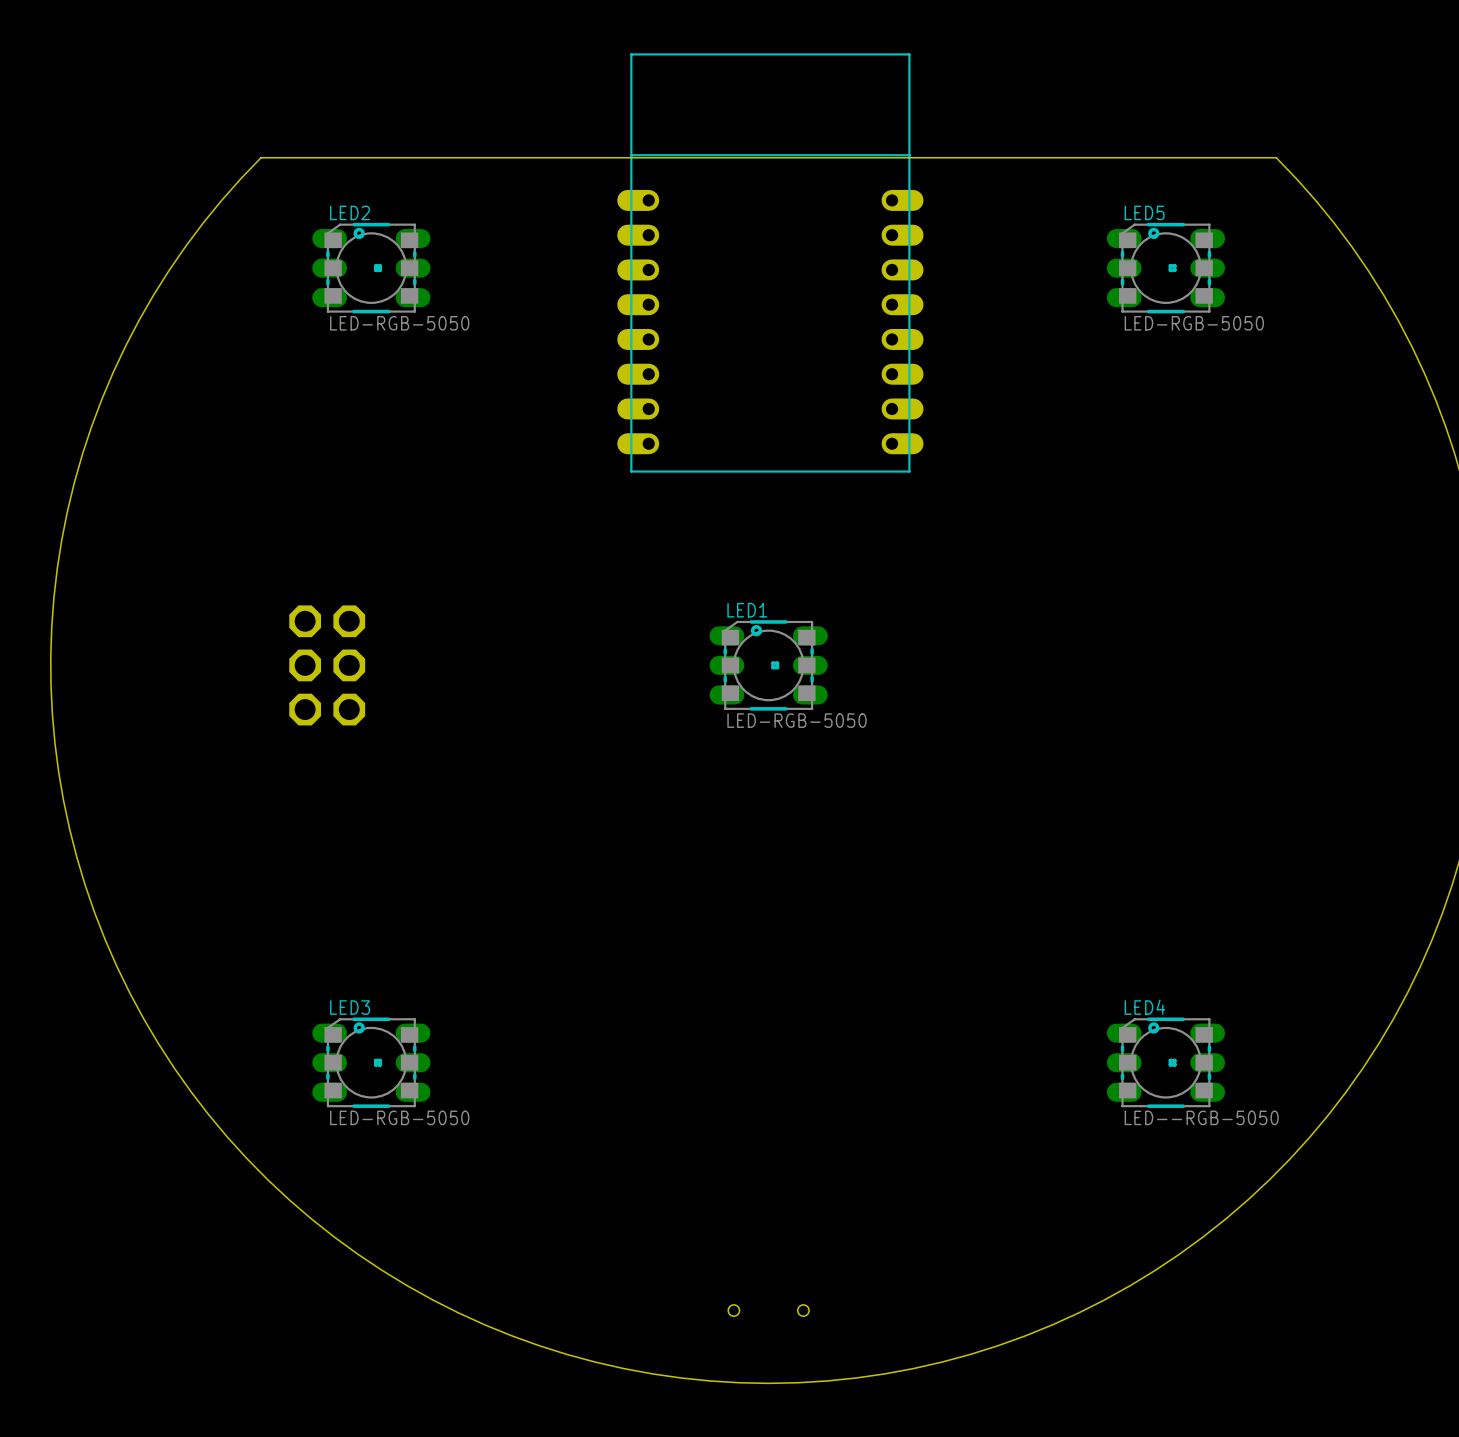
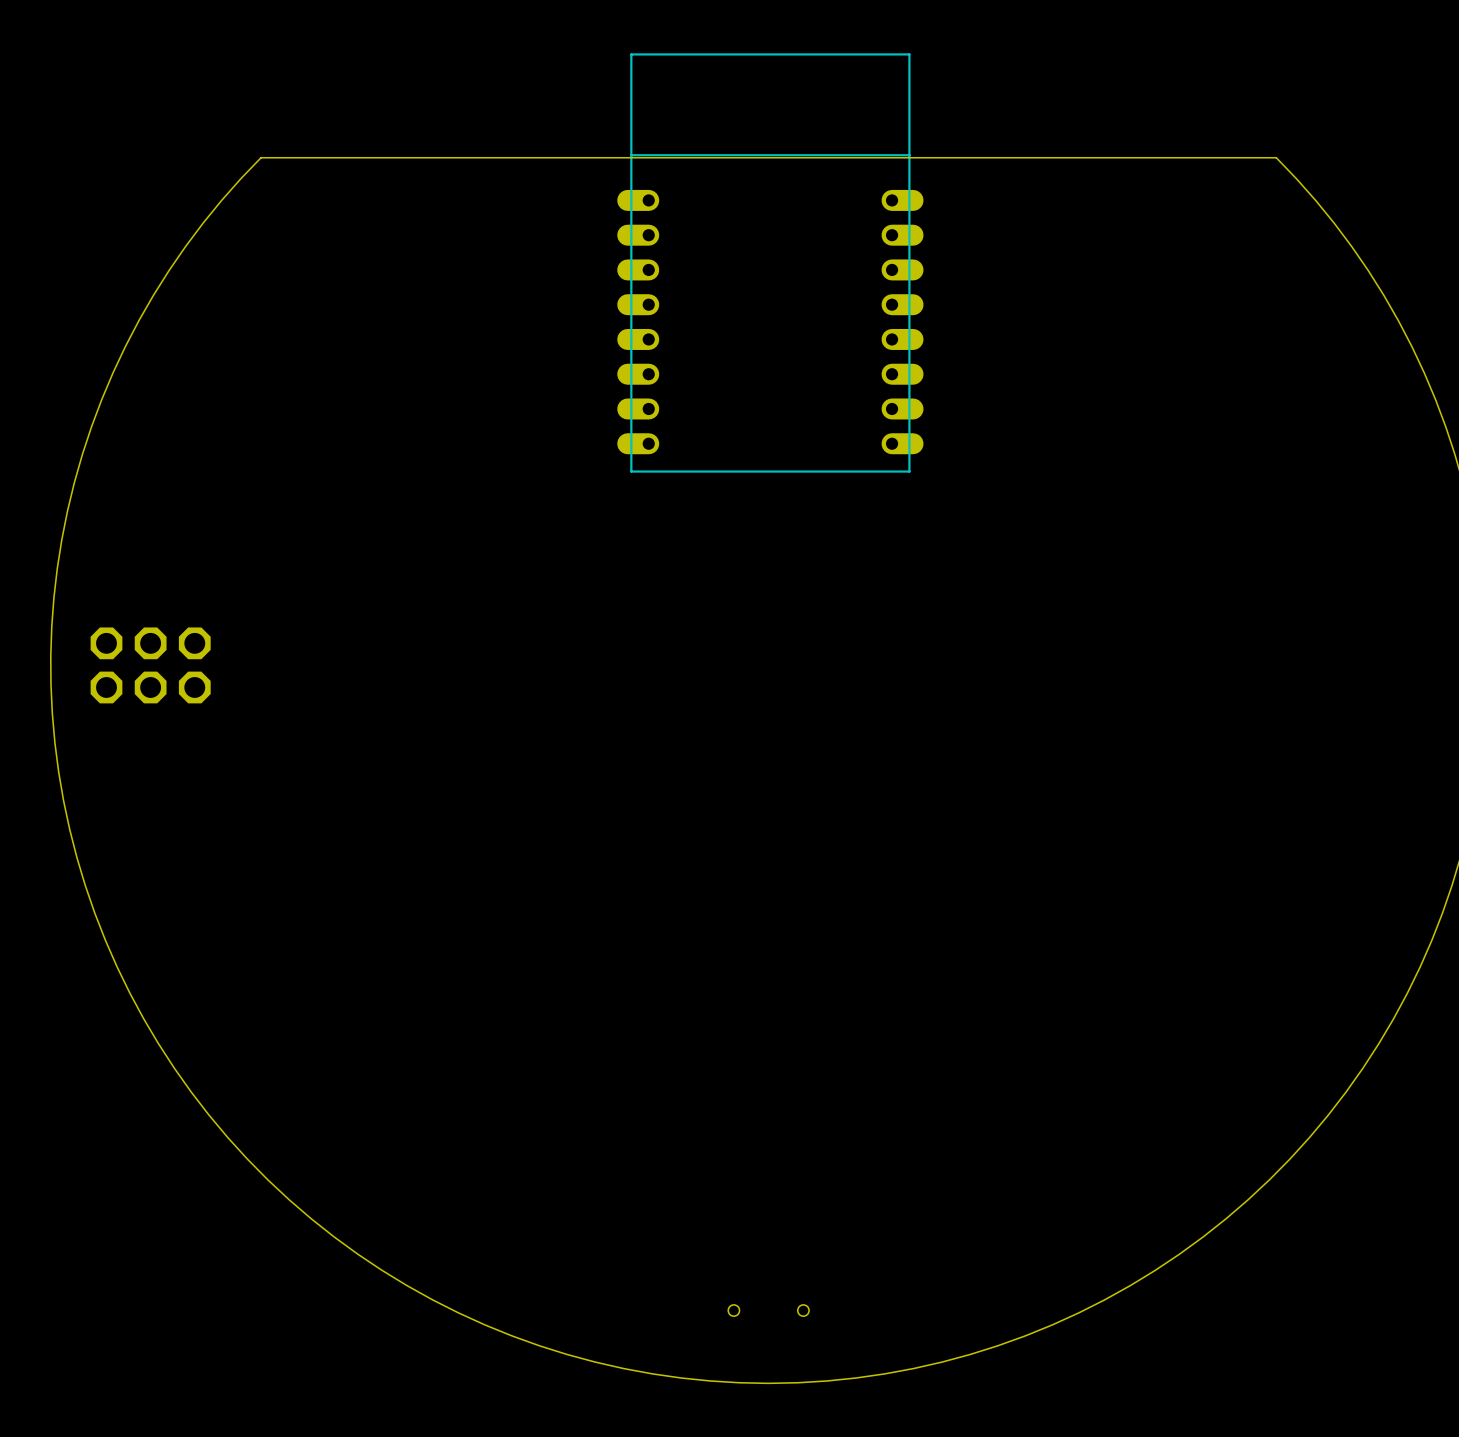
LED2: LED-RGB-5050 (371, 268) -> none
LED5: LED-RGB-5050 (1165, 268) -> none
part rotation: 0° (327, 665) -> 90° clockwise (150, 665)
part position: (327, 665) -> (150, 665)
LED1: LED-RGB-5050 (768, 665) -> none
LED3: LED-RGB-5050 (371, 1062) -> none
LED4: LED--RGB-5050 (1165, 1062) -> none

